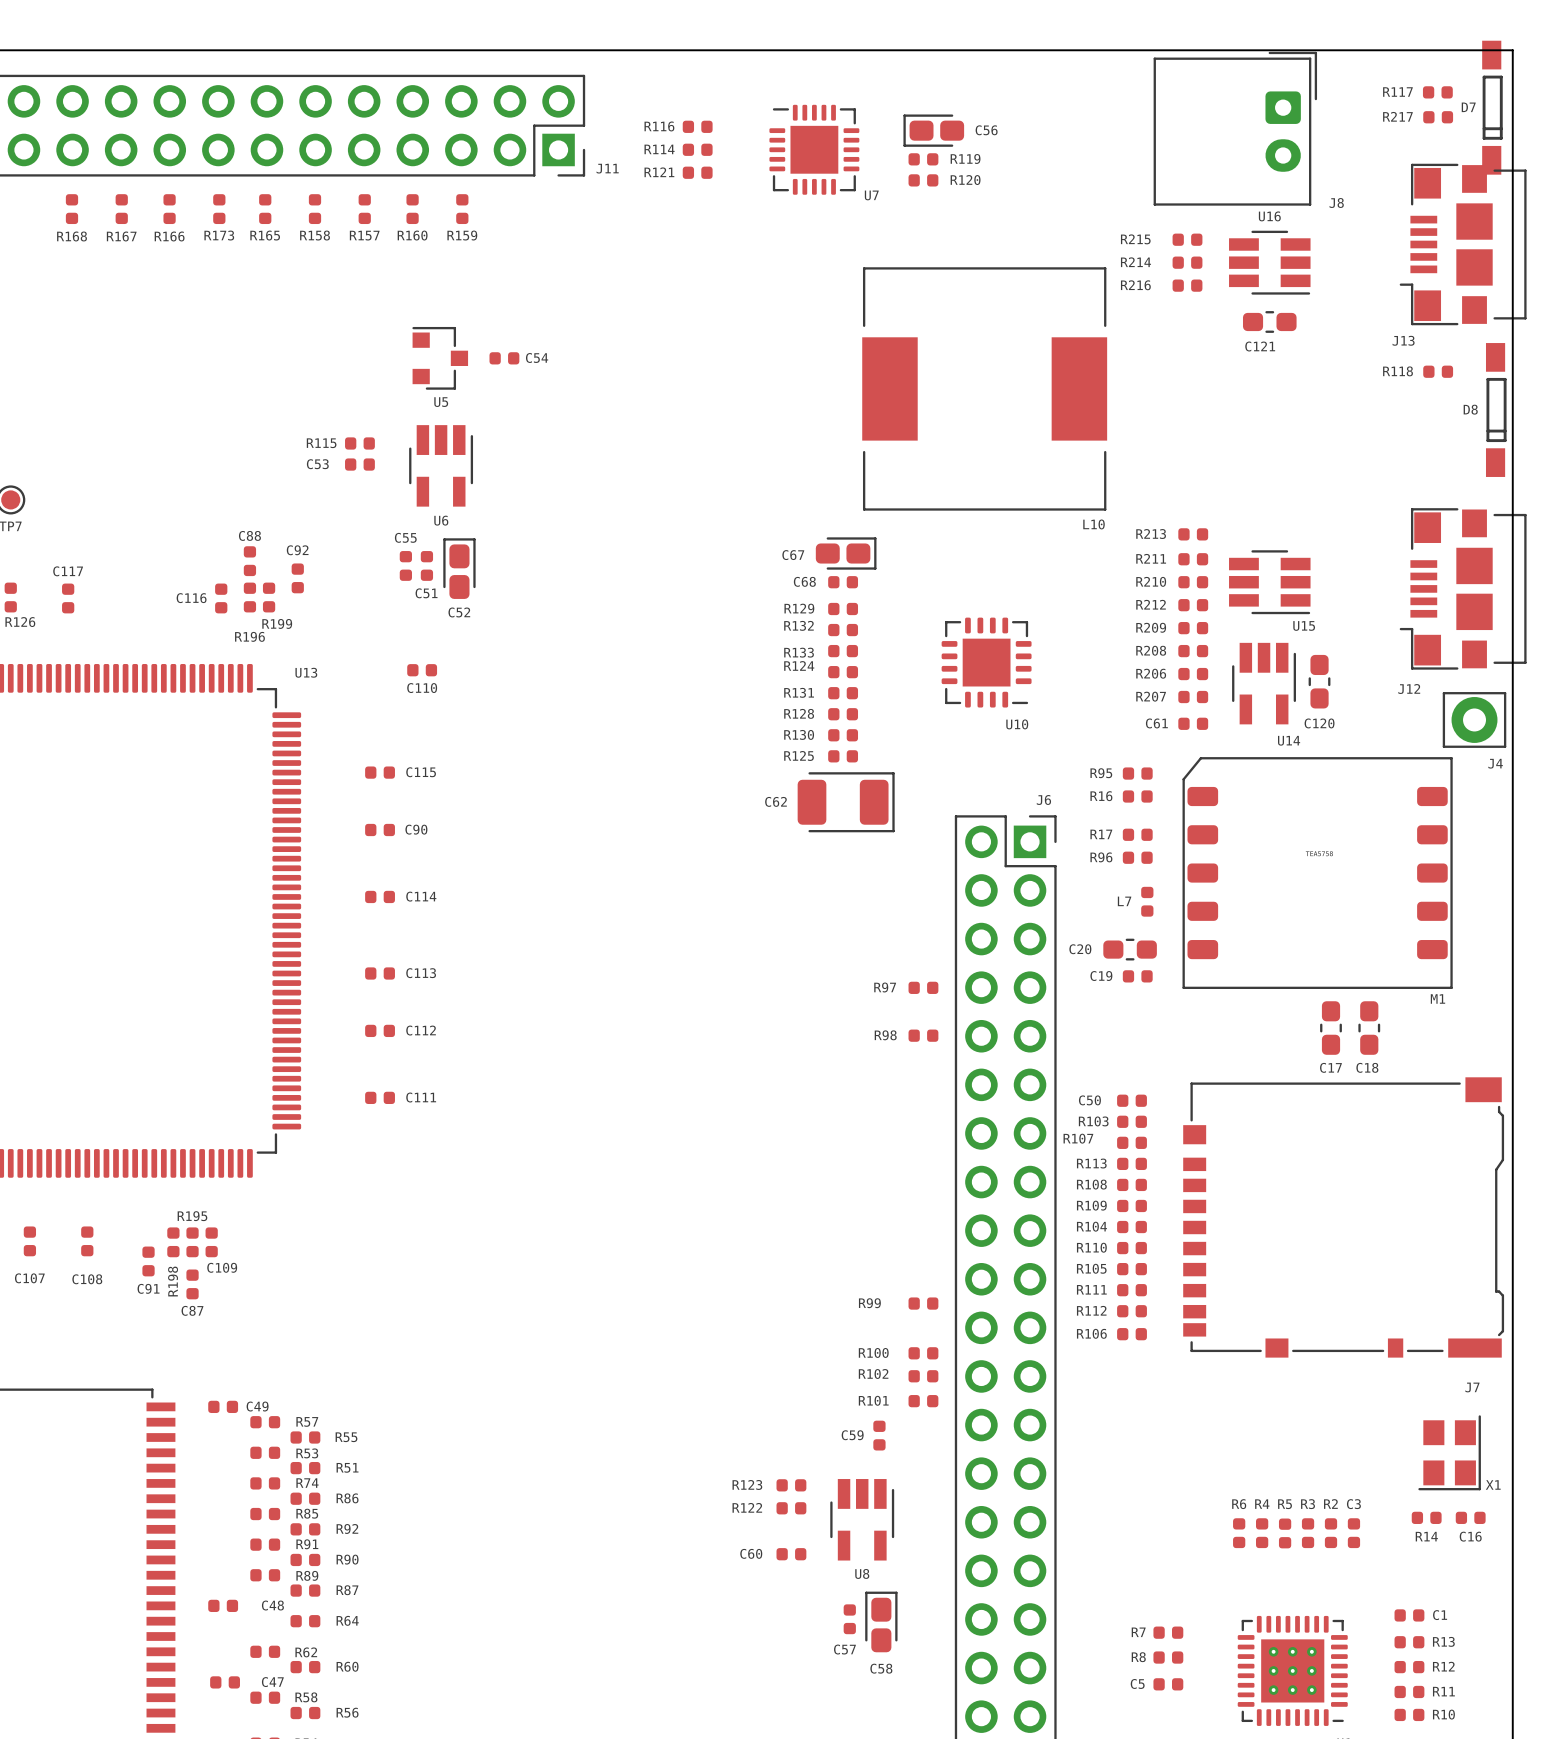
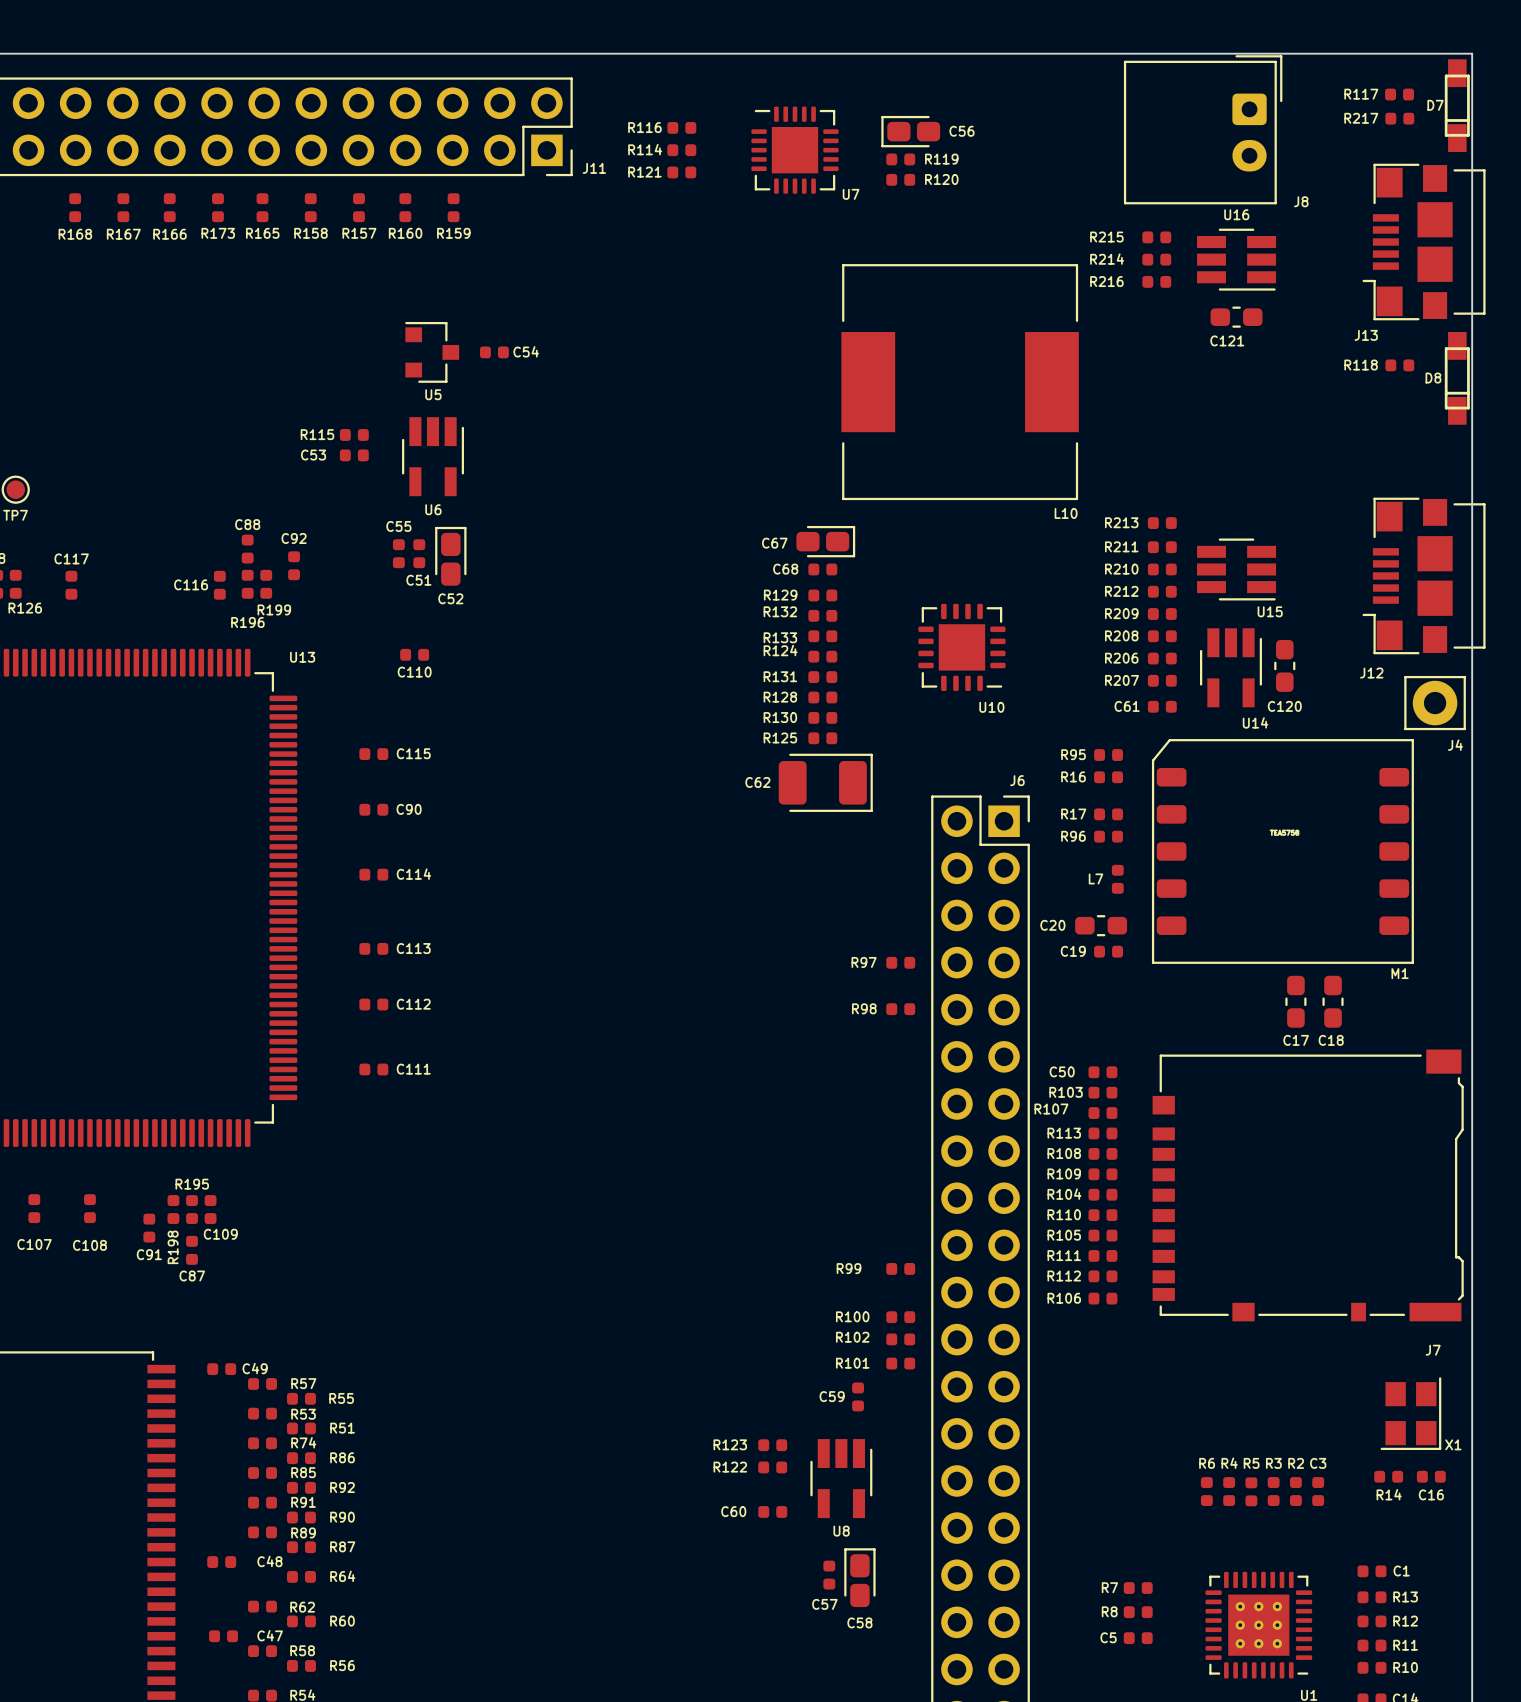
D7 footprint: [1482, 40, 1503, 175] -> [1444, 59, 1470, 153]
D8 footprint: [1485, 343, 1507, 477] -> [1444, 331, 1470, 425]

